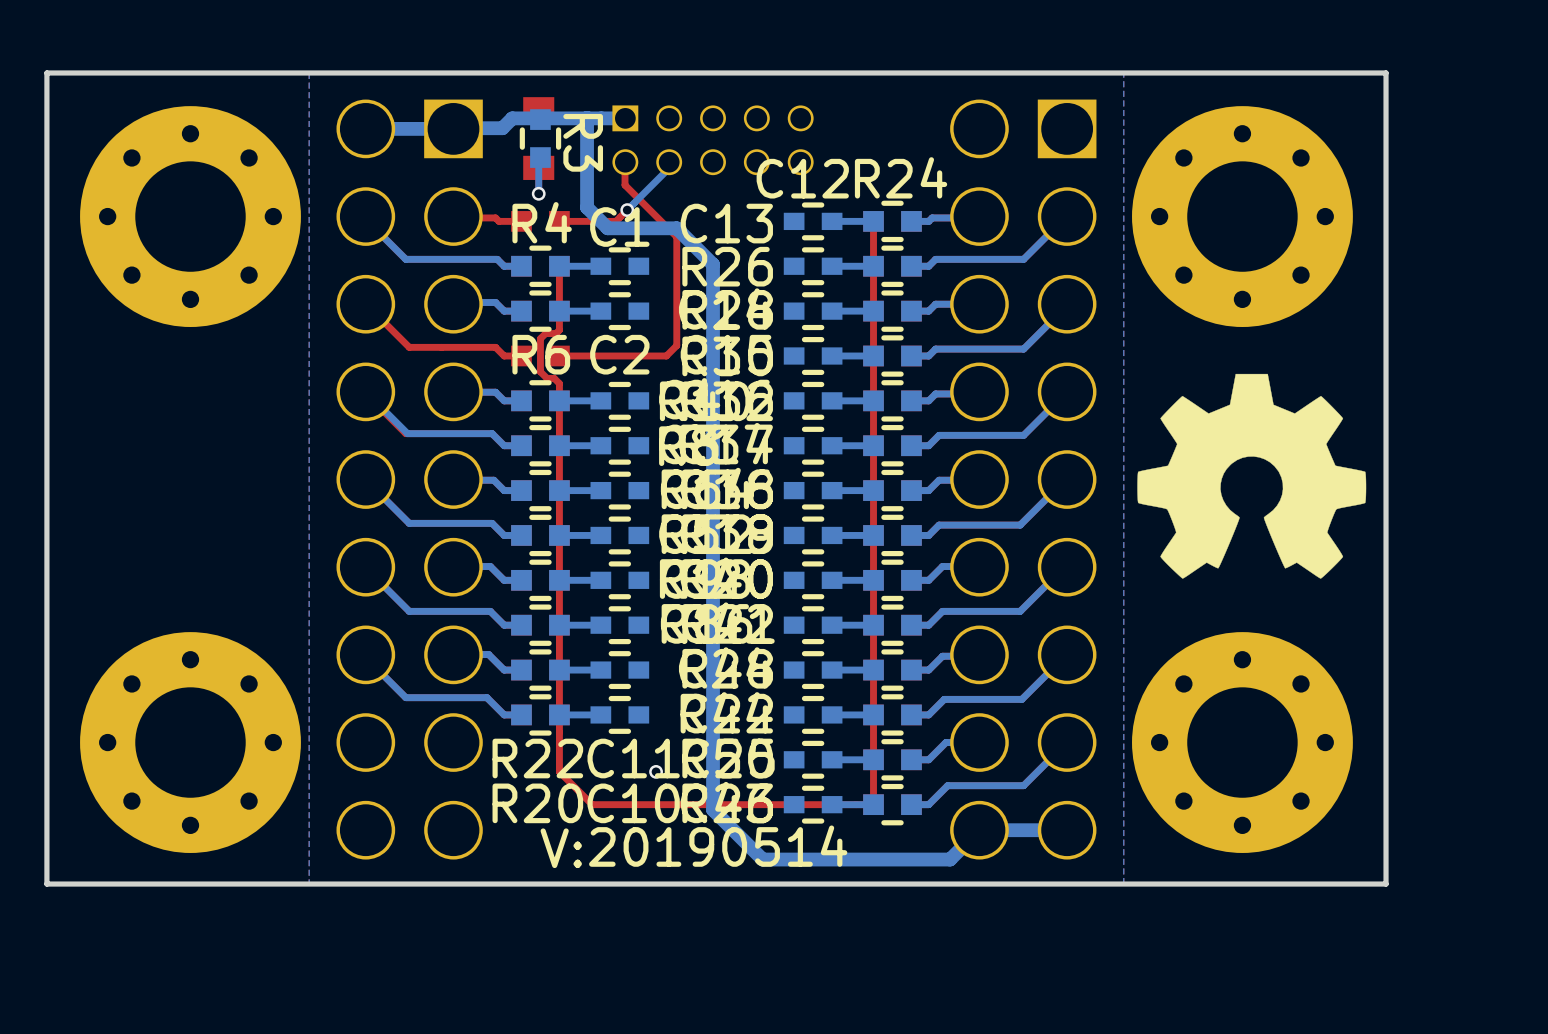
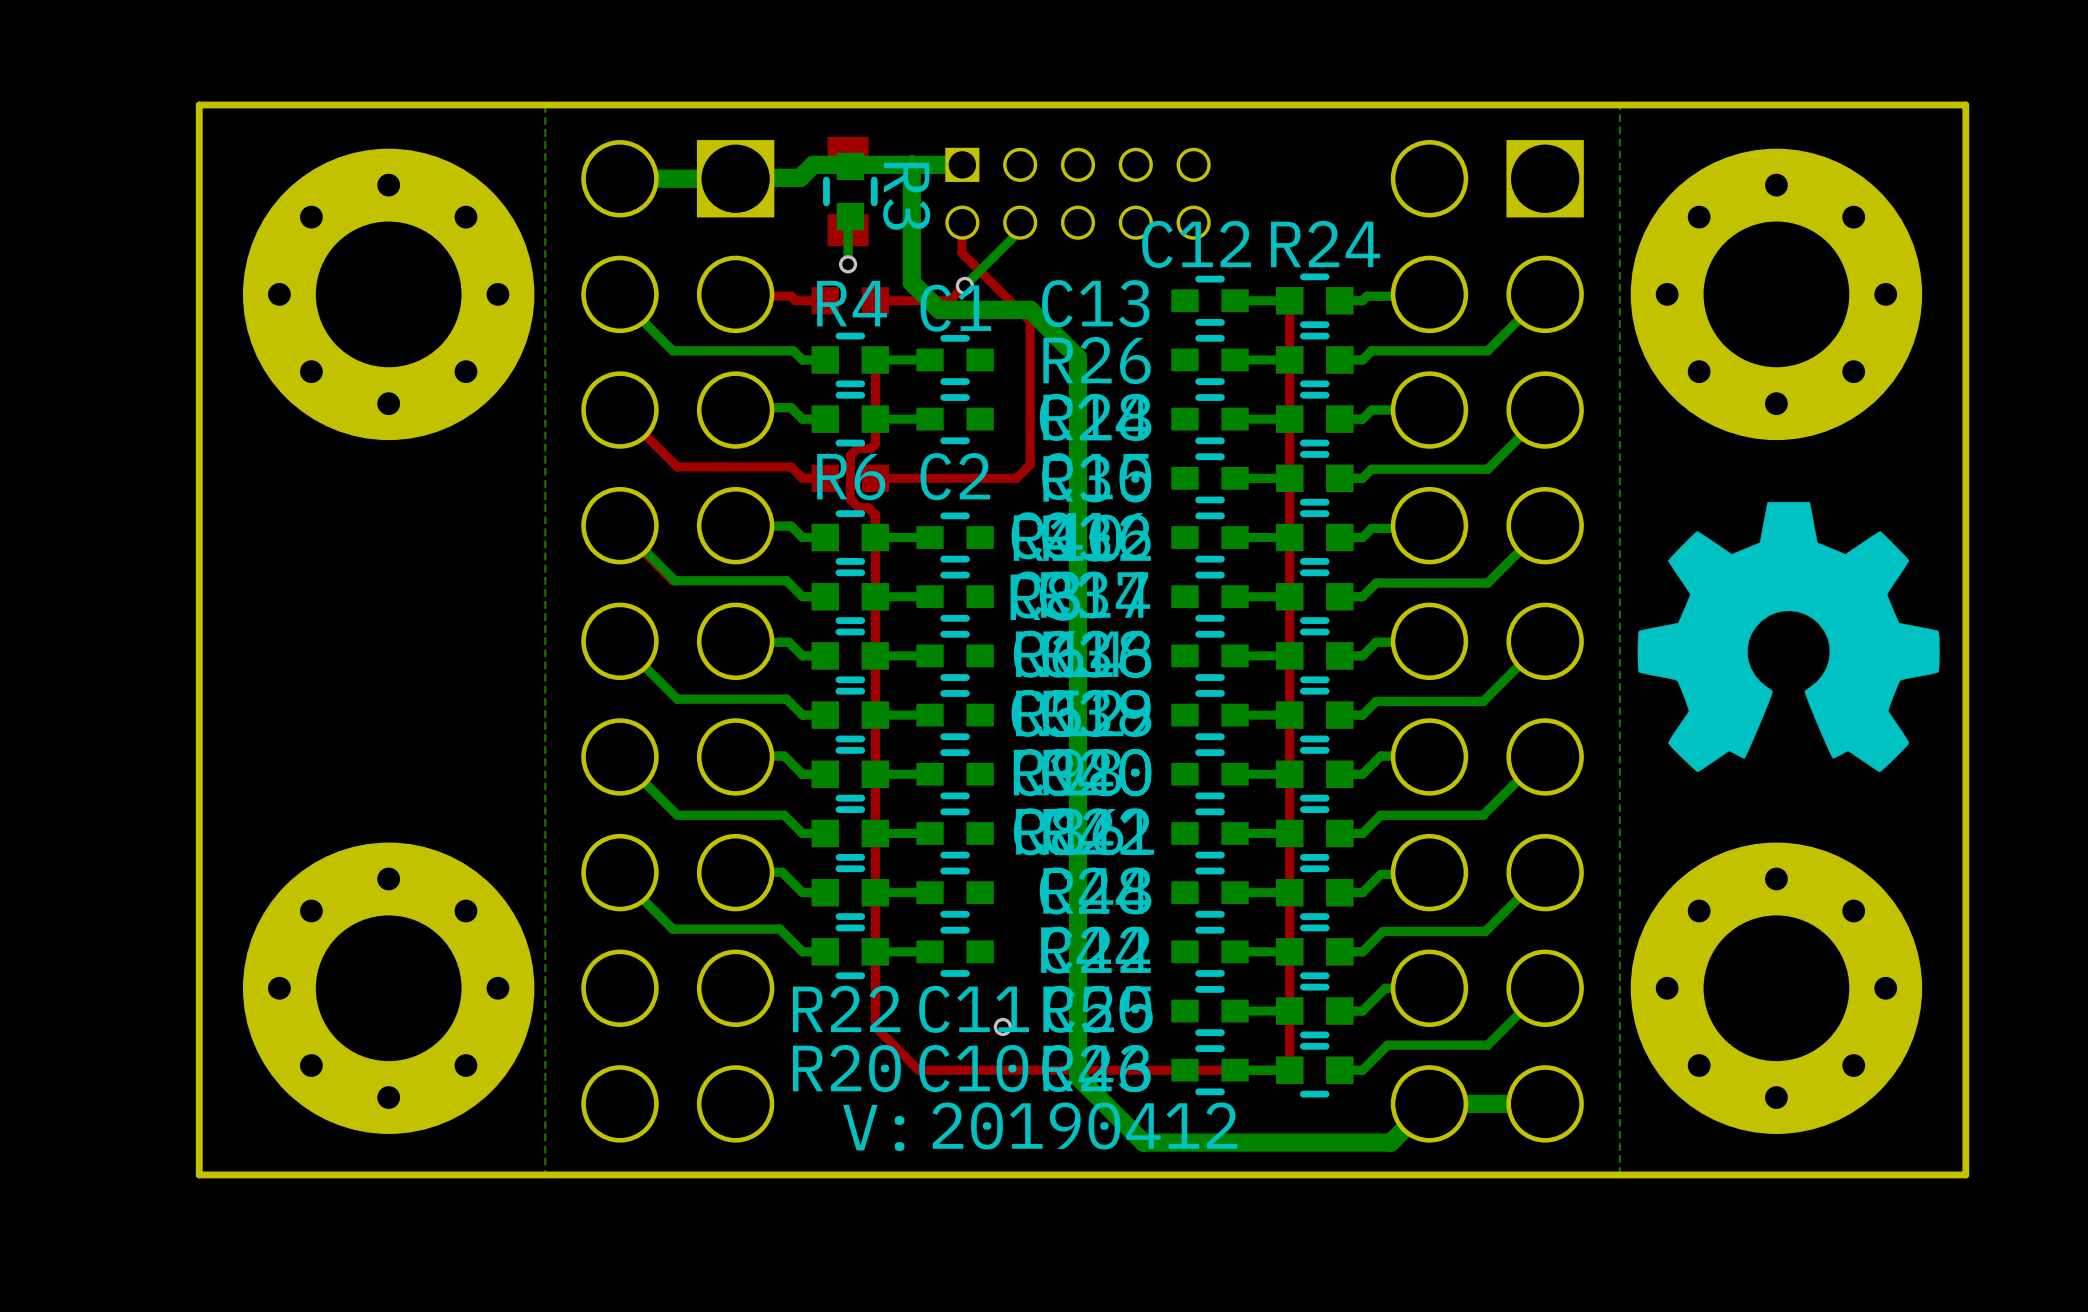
drawing shape: [540, 825, 848, 869] -> [843, 1102, 1238, 1152]

